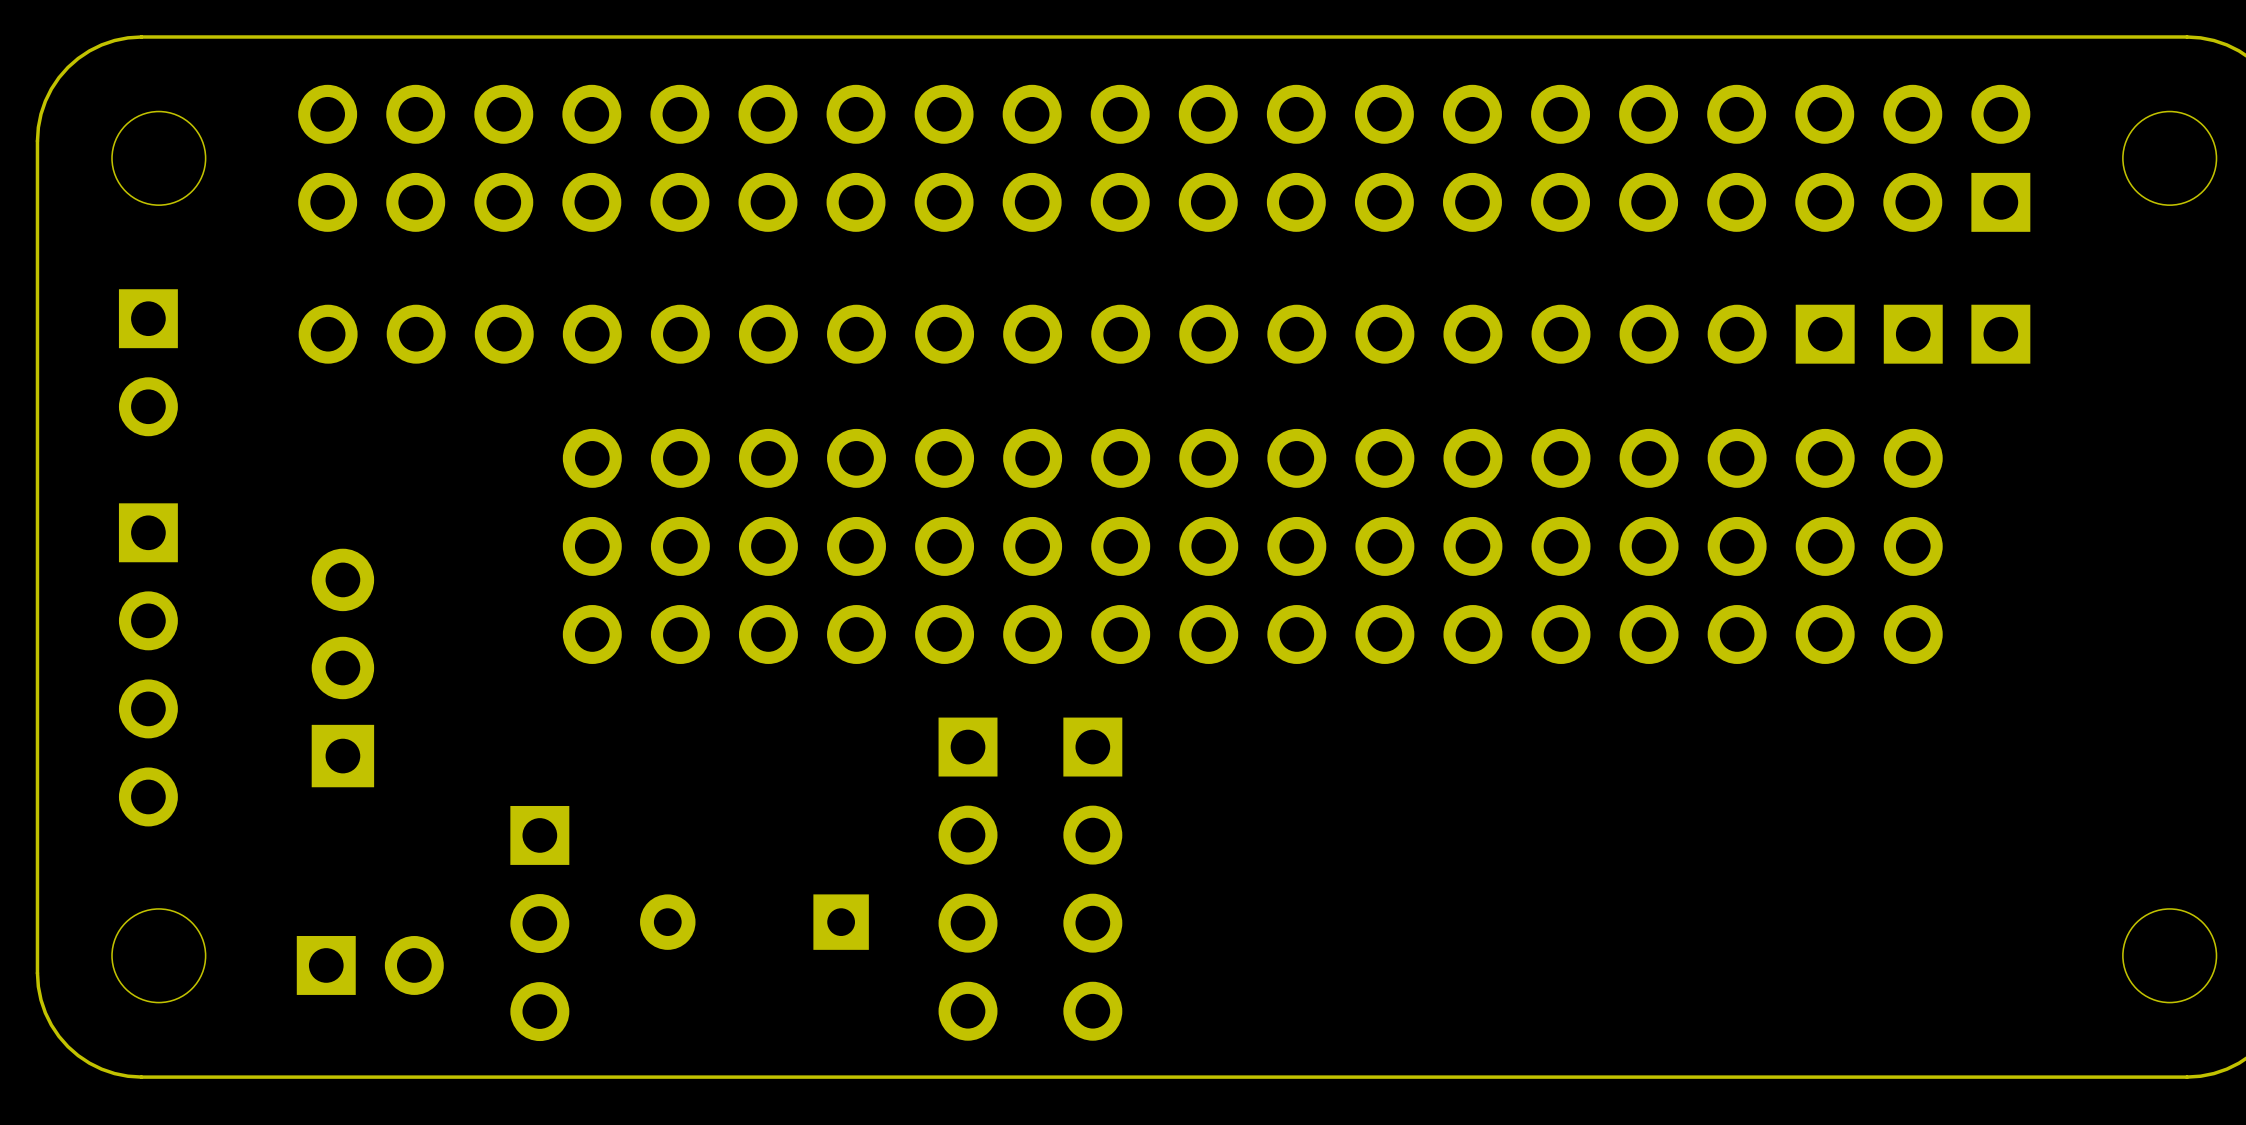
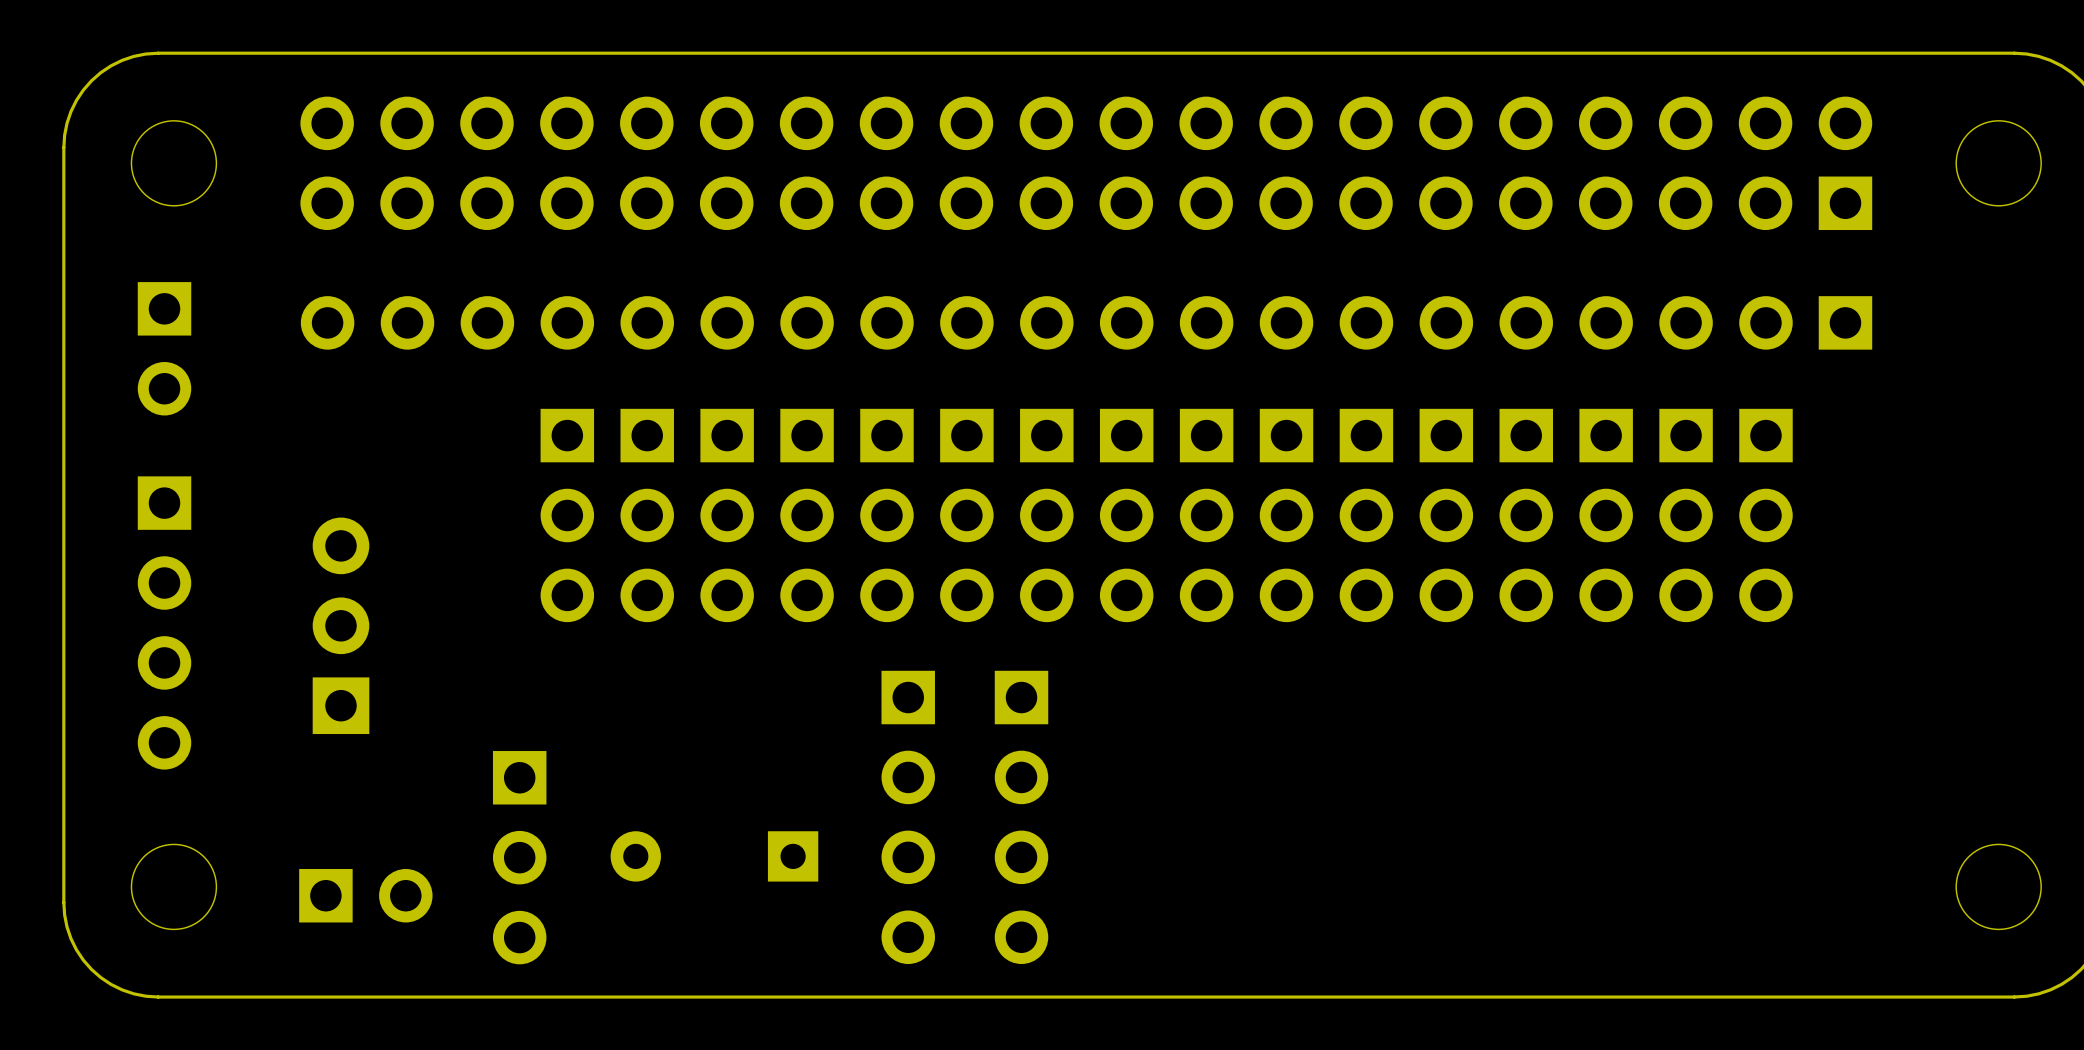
part footprint: [298, 304, 2031, 364] -> [300, 296, 1873, 350]
part footprint: [562, 428, 622, 664] -> [540, 408, 595, 623]
part footprint: [650, 428, 710, 664] -> [620, 408, 674, 623]
part footprint: [738, 428, 798, 664] -> [700, 408, 754, 623]
part footprint: [827, 428, 886, 664] -> [780, 408, 834, 623]
part footprint: [915, 428, 975, 664] -> [860, 408, 914, 623]
part footprint: [1003, 428, 1063, 664] -> [940, 408, 994, 623]
part footprint: [1091, 428, 1151, 664] -> [1020, 408, 1074, 623]
part footprint: [1179, 428, 1239, 664] -> [1099, 408, 1154, 623]
part footprint: [1267, 428, 1327, 664] -> [1179, 408, 1234, 623]
part footprint: [1355, 428, 1415, 664] -> [1259, 408, 1314, 623]
part footprint: [1443, 428, 1503, 664] -> [1339, 408, 1394, 623]
part footprint: [1531, 428, 1591, 664] -> [1419, 408, 1474, 623]
part footprint: [1619, 428, 1679, 664] -> [1499, 408, 1553, 623]
part footprint: [1707, 428, 1767, 664] -> [1579, 408, 1633, 623]
part footprint: [1795, 428, 1855, 664] -> [1659, 408, 1713, 623]
part footprint: [1883, 428, 1943, 664] -> [1739, 408, 1793, 623]

